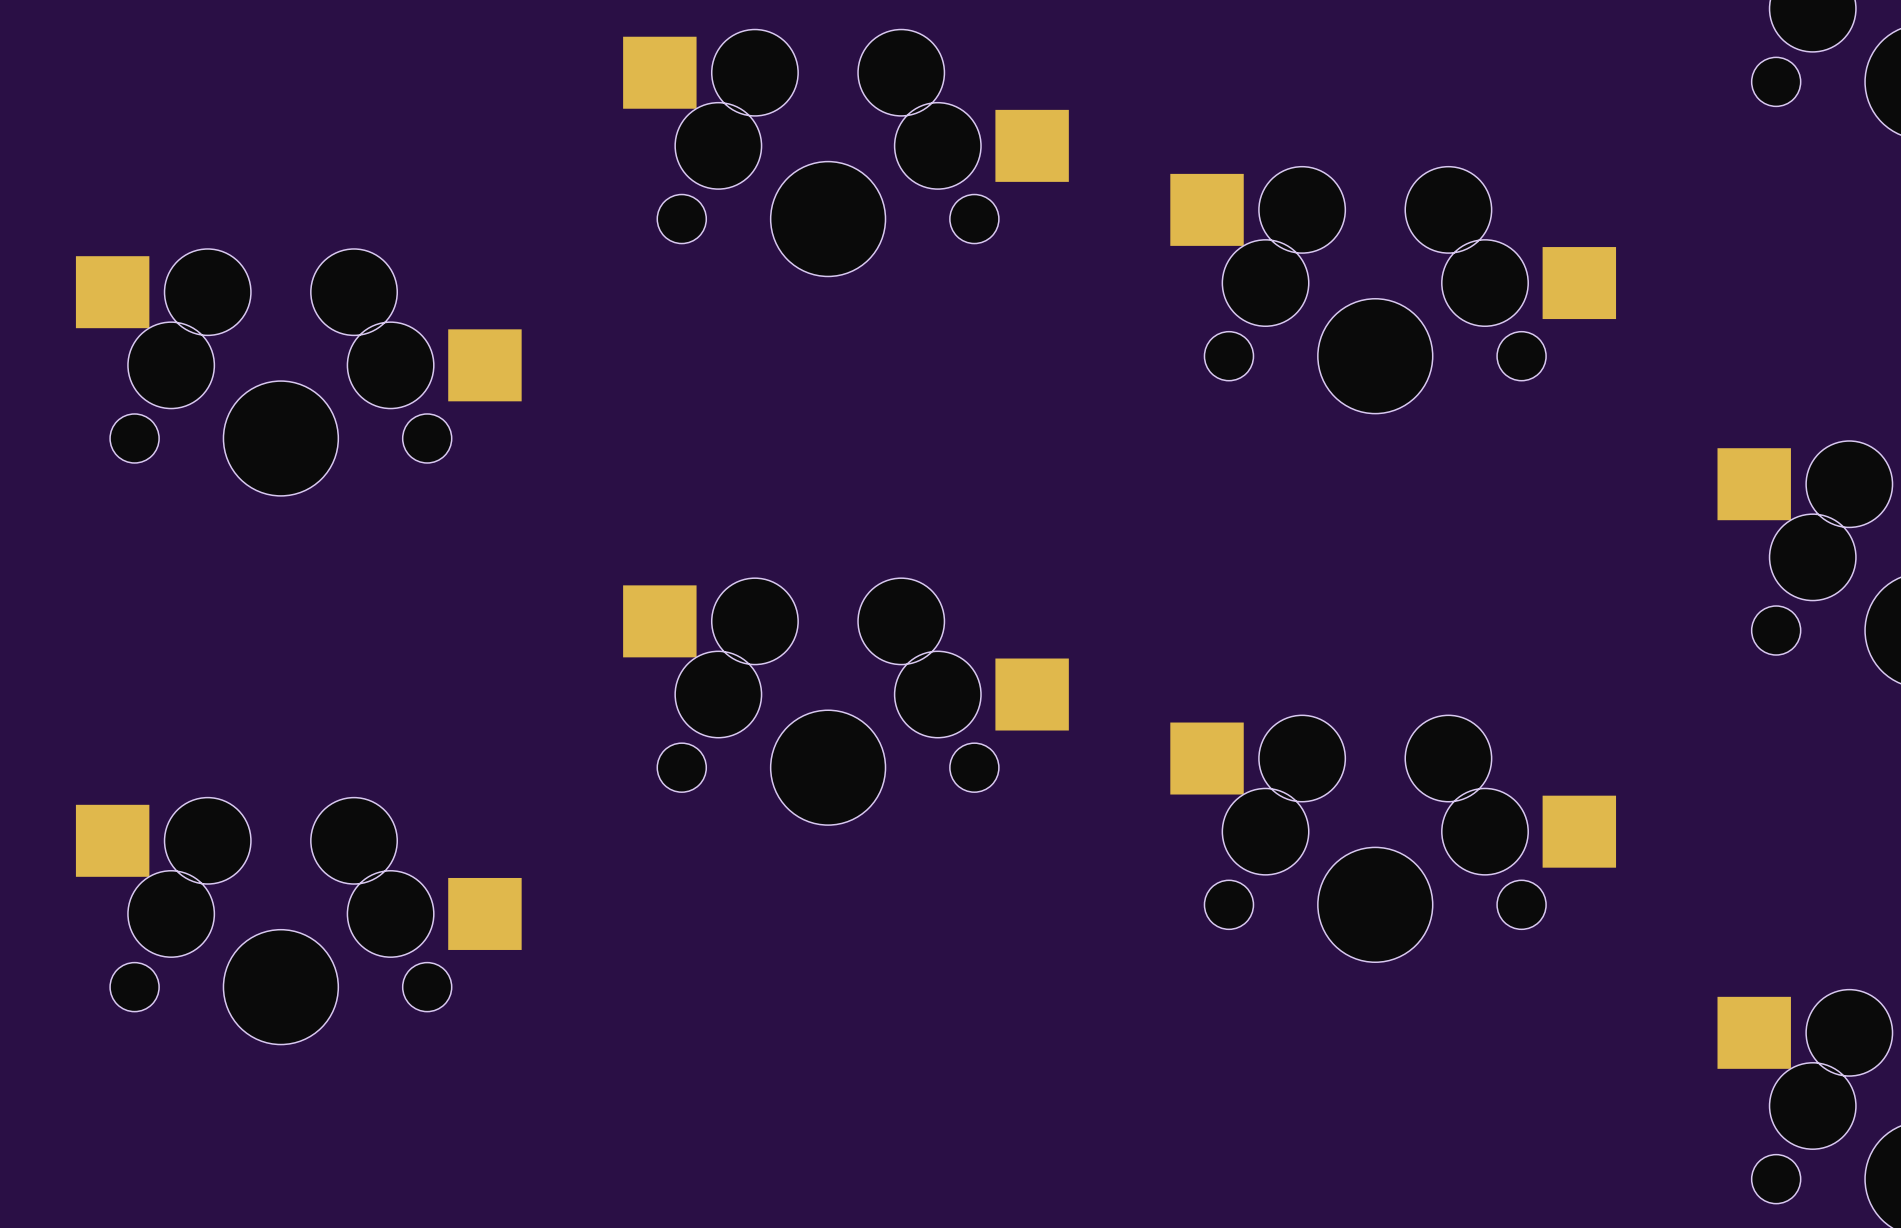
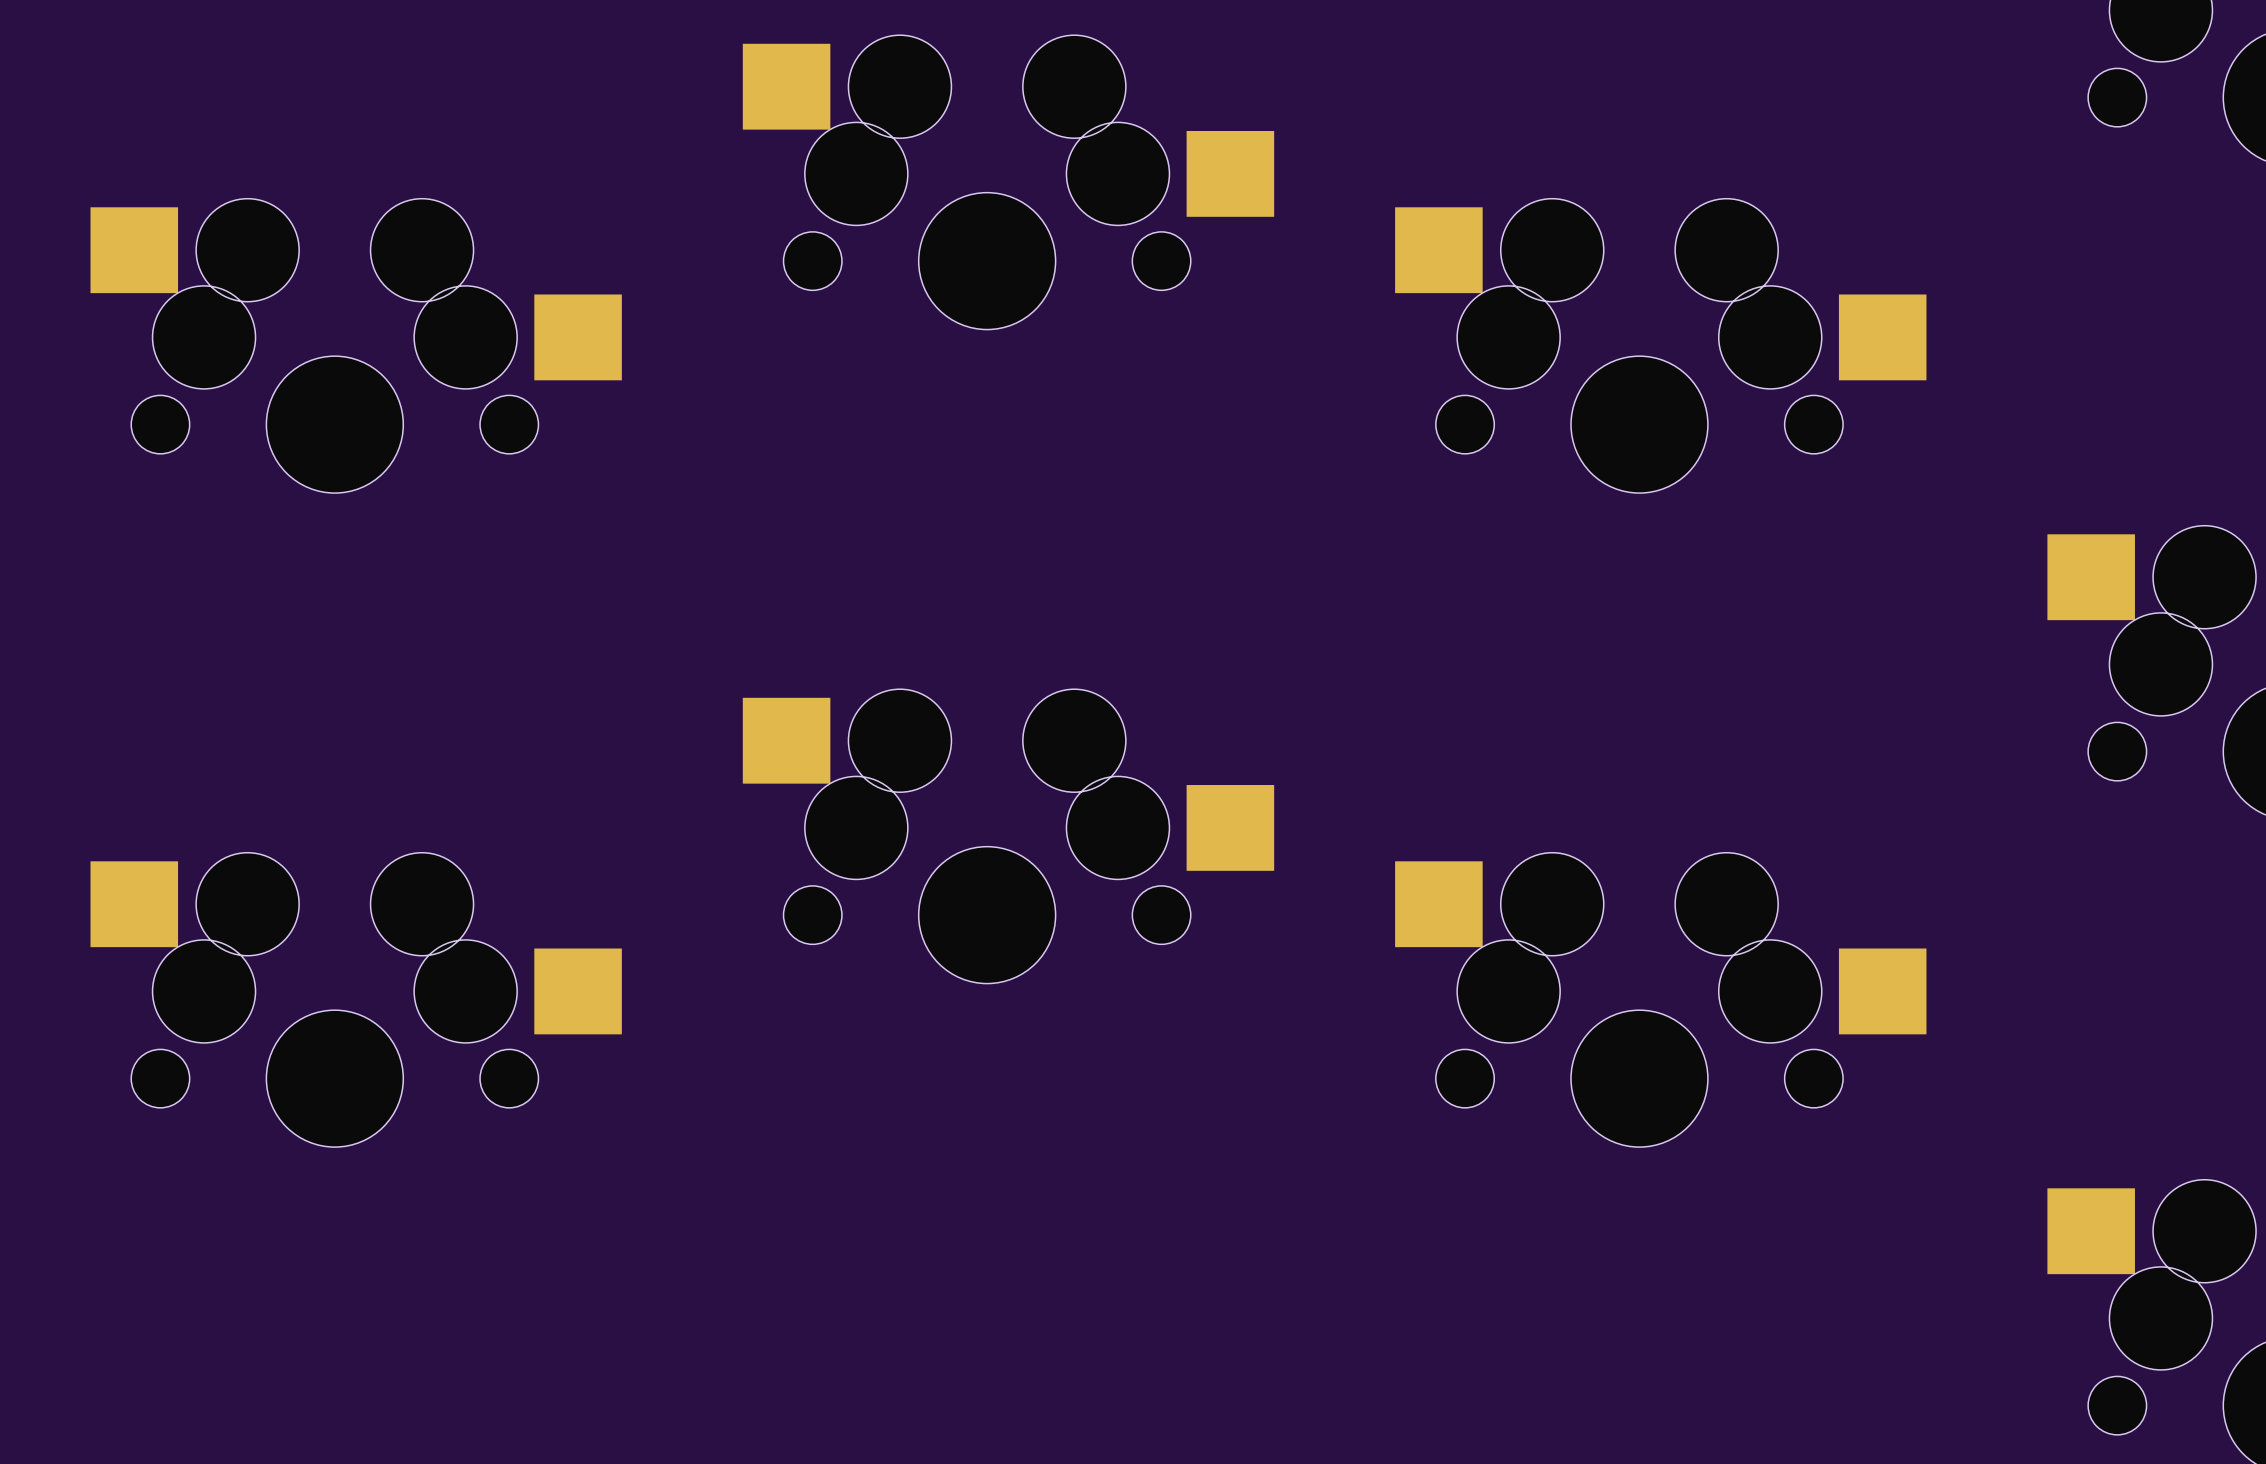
part position: (298, 372) -> (356, 345)
part position: (298, 921) -> (356, 999)

